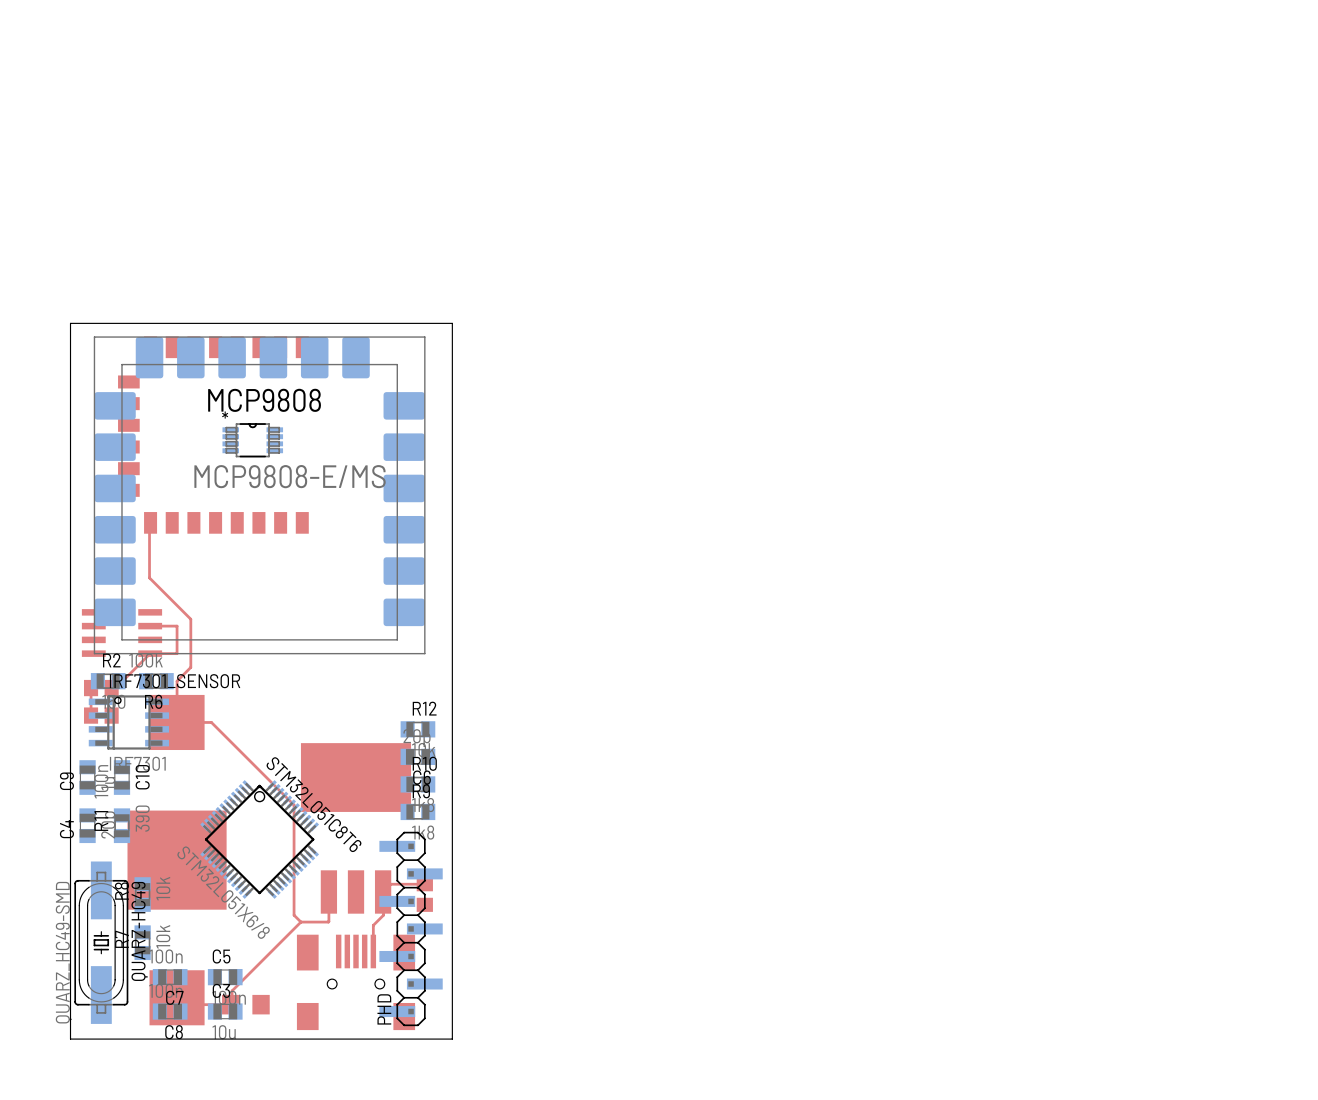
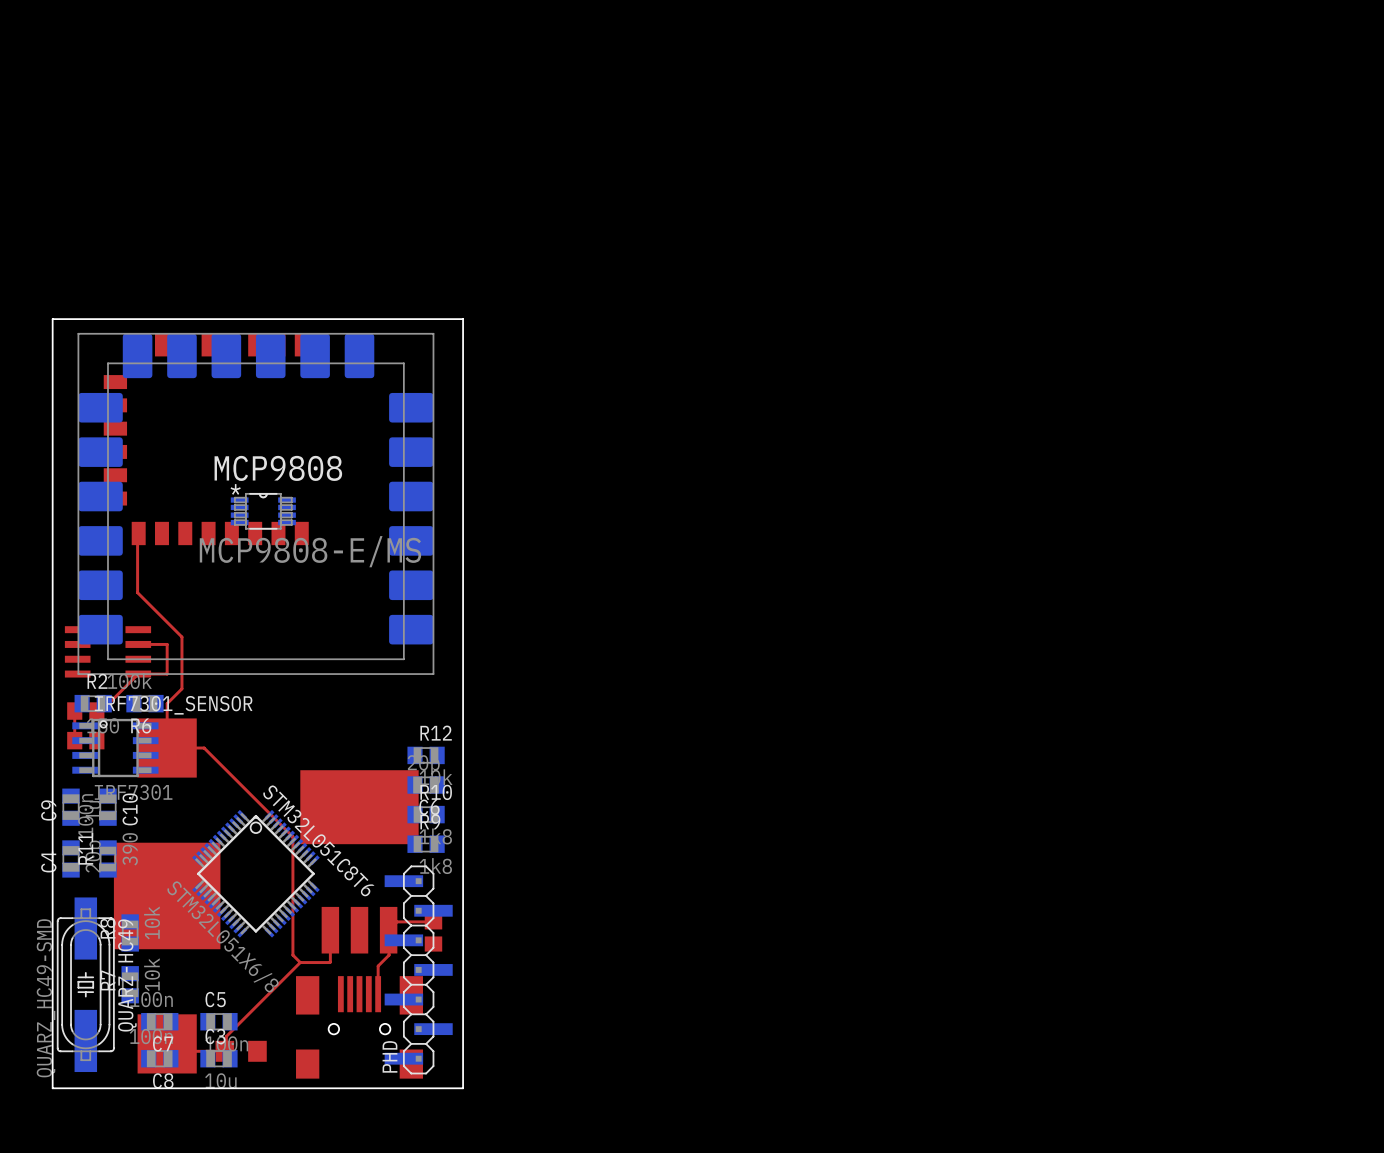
MCP9808 position: (252, 440) -> (263, 511)

